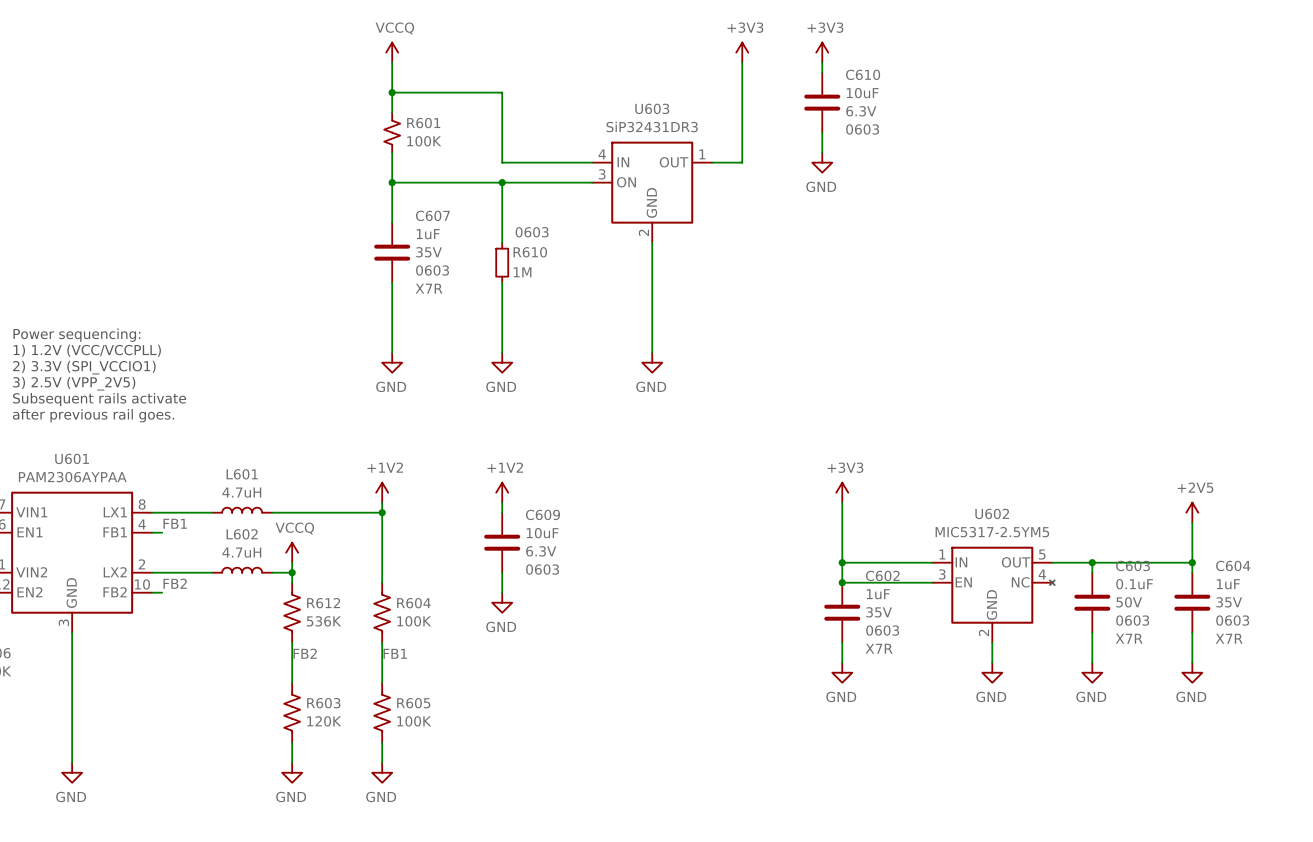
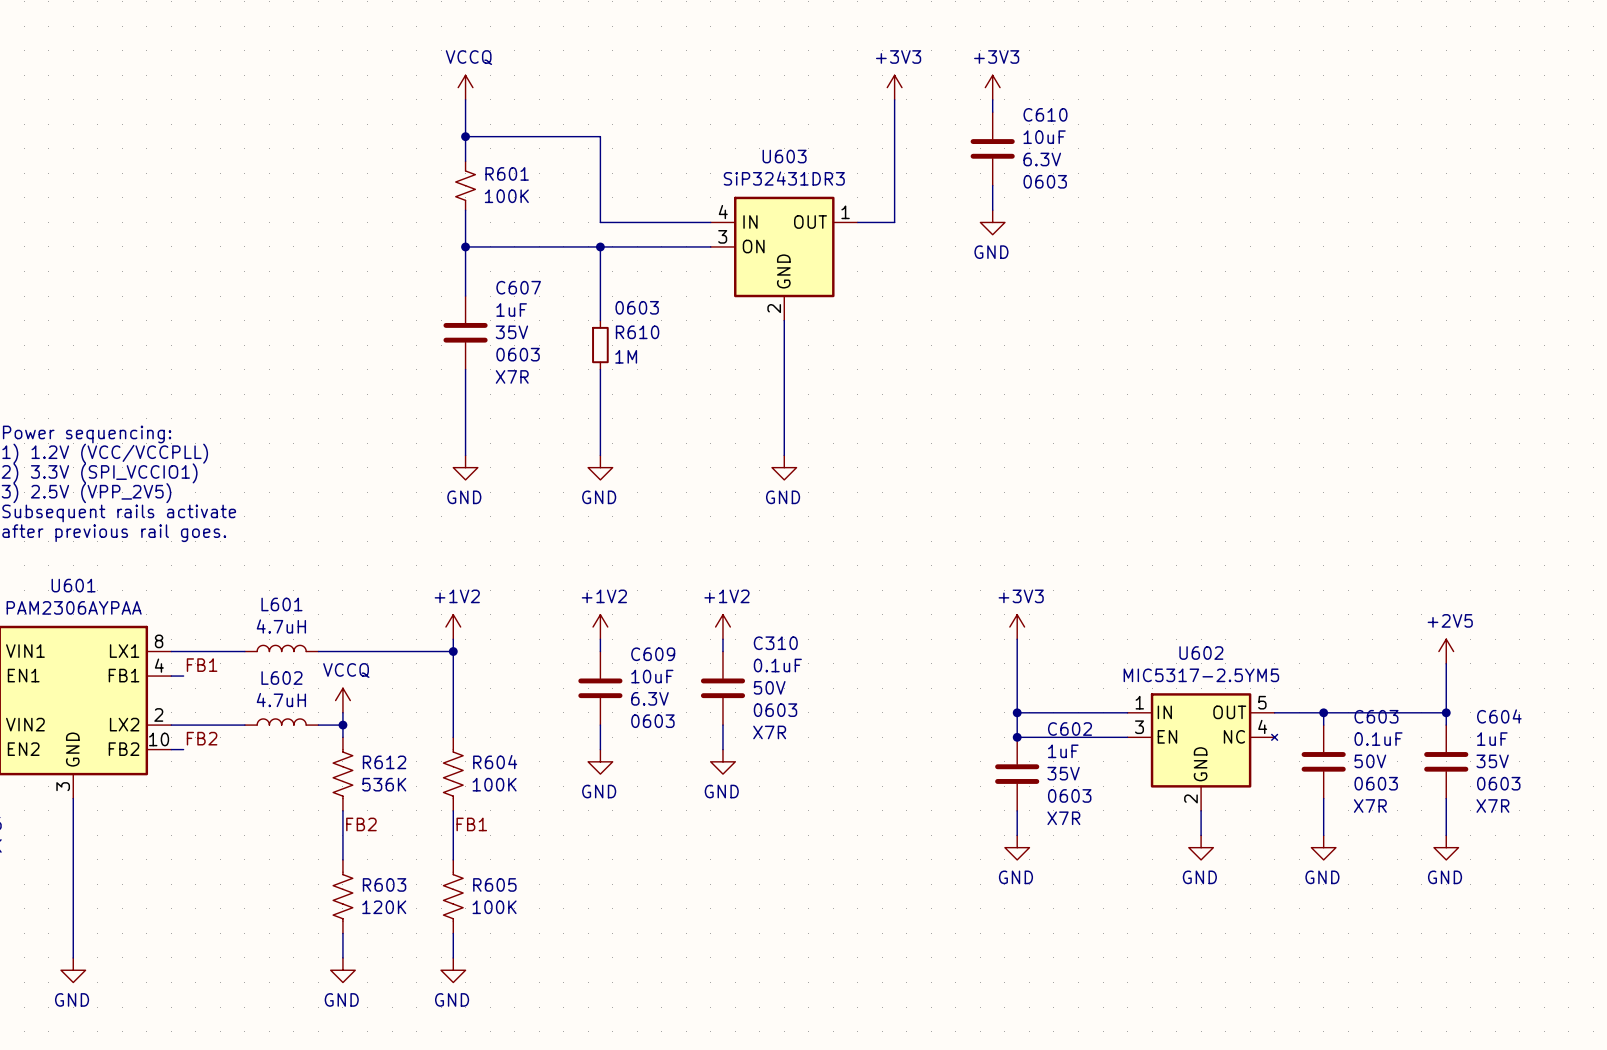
power symbol: none -> +1V2 (722, 627)
wire: none -> (722, 639) (722, 651)
C310: none -> 0.1uF (722, 688)
wire: none -> (722, 725) (722, 749)
power symbol: none -> GND (722, 761)

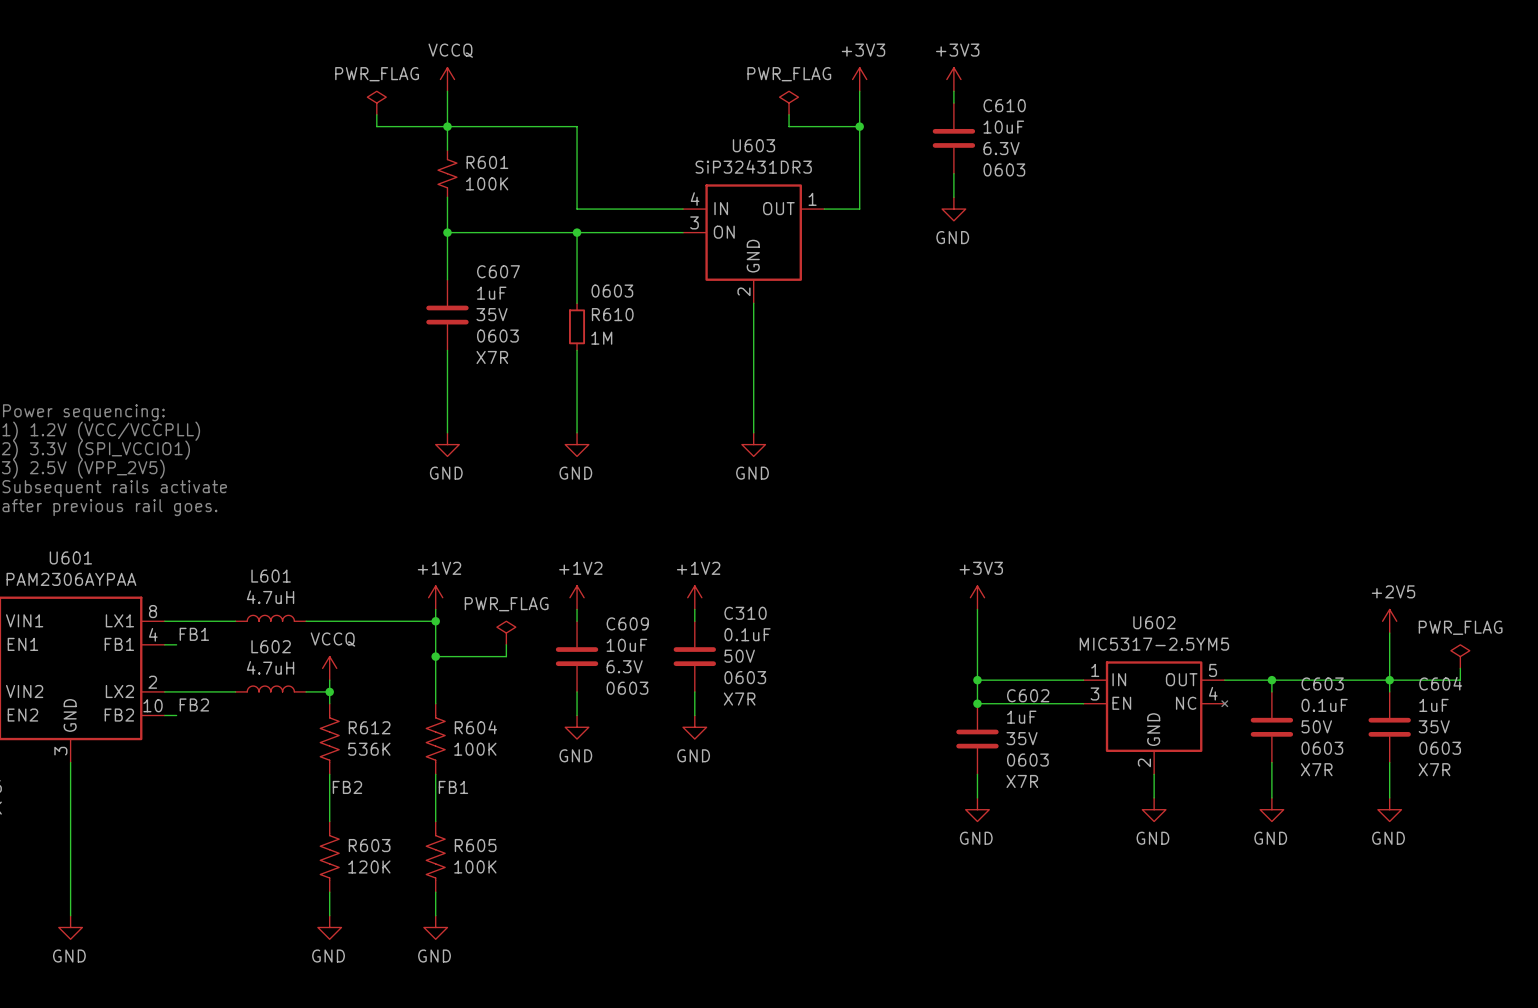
power symbol: none -> PWR_FLAG (376, 103)
power symbol: none -> PWR_FLAG (789, 103)
wire: none -> (376, 114) (376, 126) (447, 126)
wire: none -> (789, 114) (789, 126) (859, 126)
junction: none -> (859, 126)
power symbol: none -> PWR_FLAG (506, 633)
wire: none -> (506, 644) (506, 656) (435, 656)
junction: none -> (435, 656)
power symbol: none -> PWR_FLAG (1460, 656)
wire: none -> (1460, 668) (1460, 680) (1389, 680)

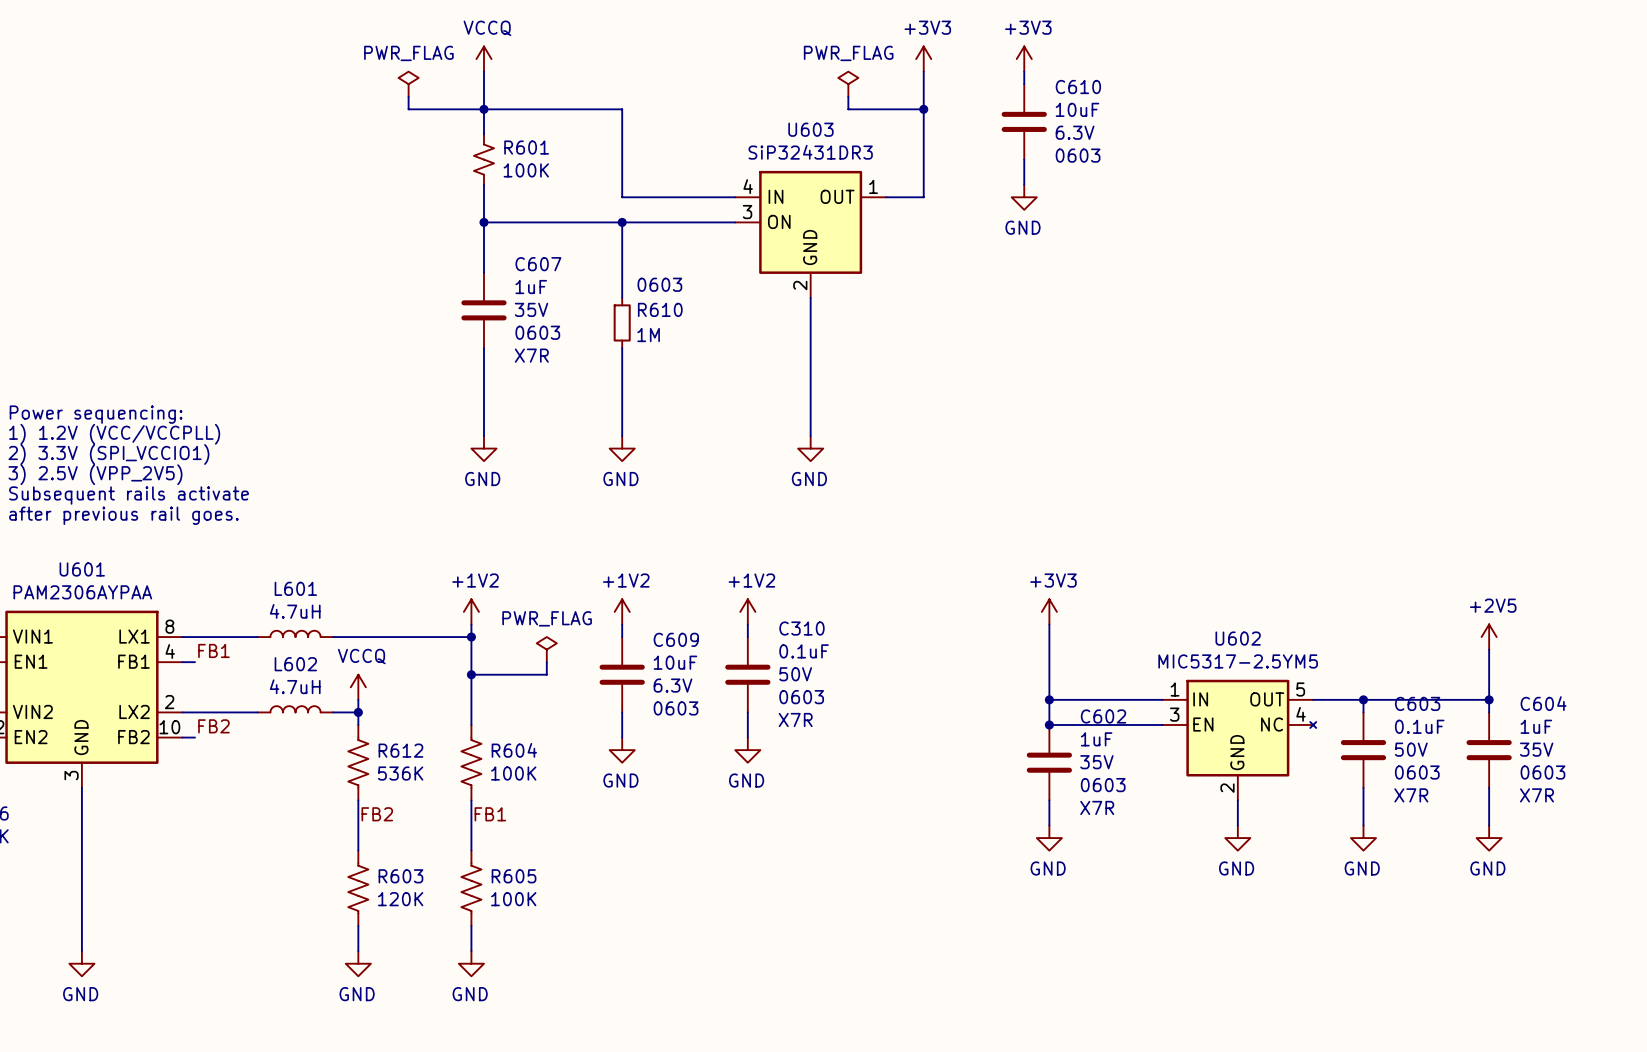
power symbol: PWR_FLAG (1460, 656) -> none
wire: (1460, 668) (1460, 680) (1389, 680) -> none

